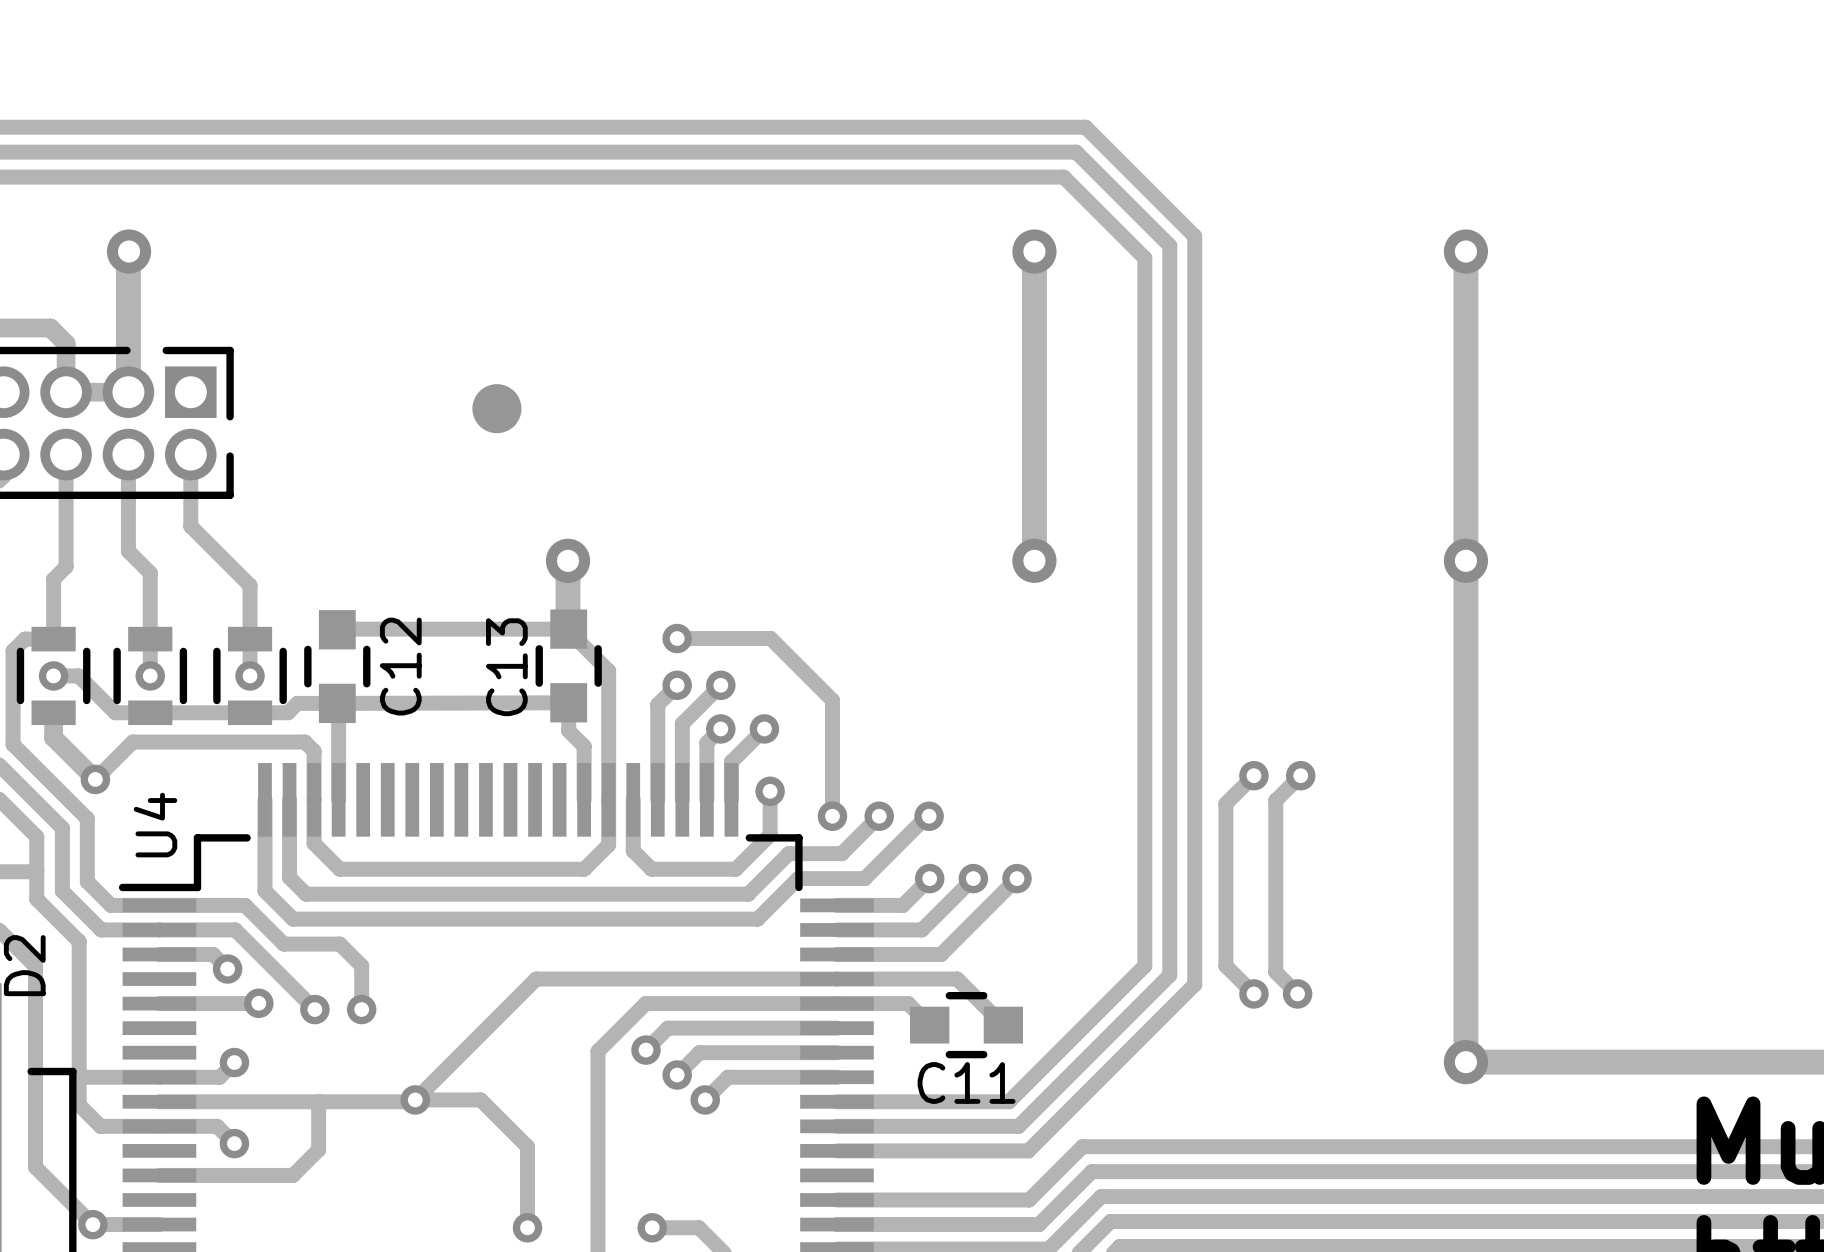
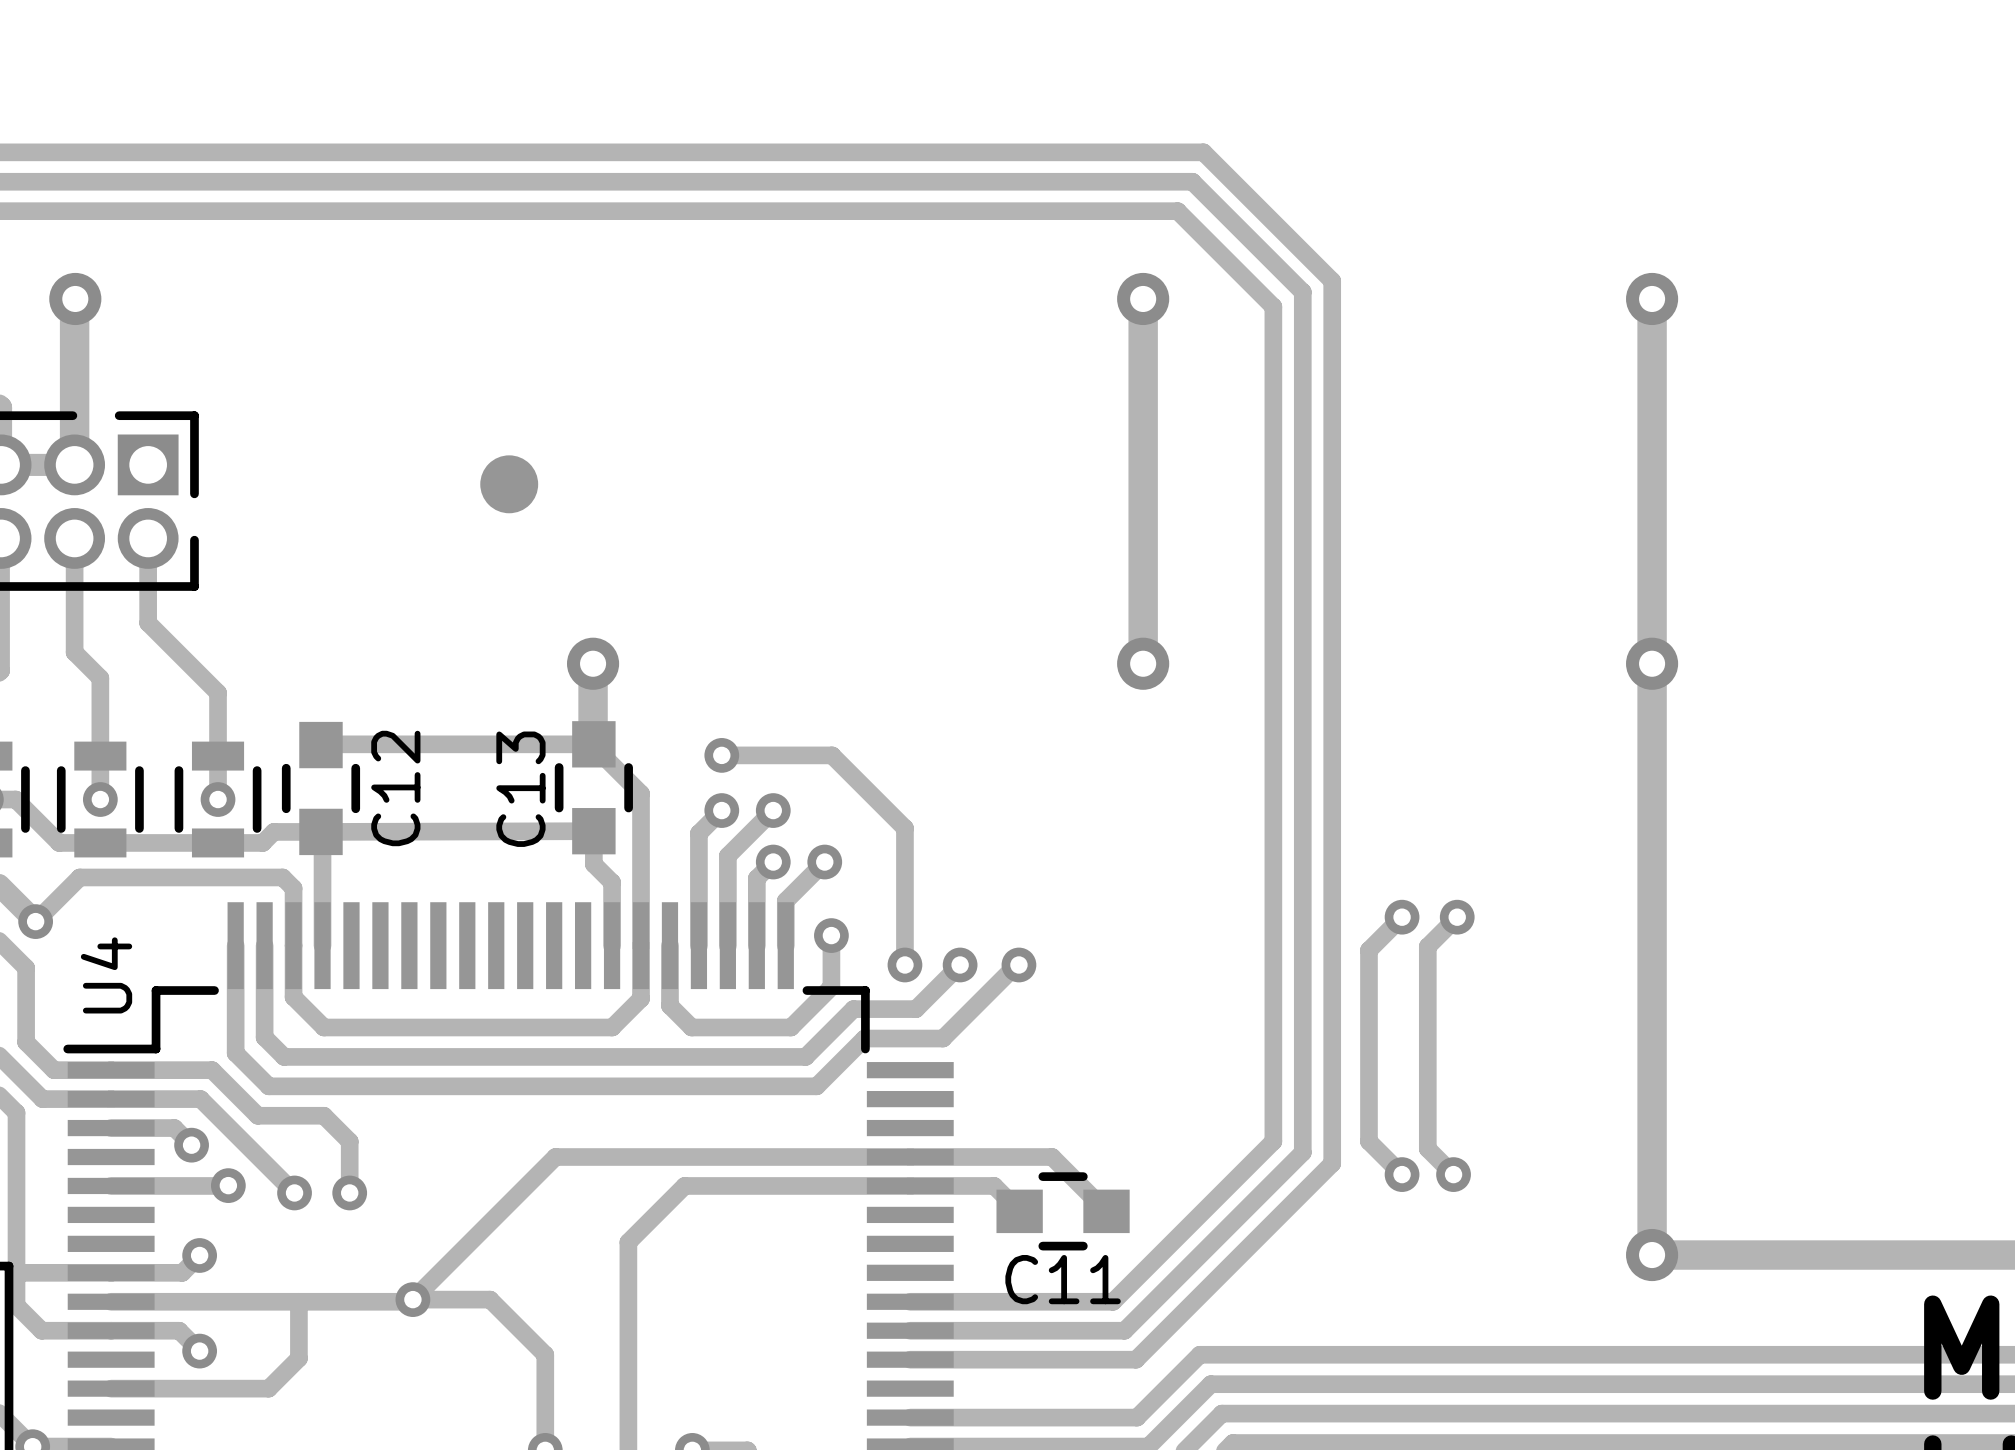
track: (929, 878) (902, 905) (836, 905) -> none
via: (929, 878) -> none
track: (973, 878) (922, 929) (836, 929) -> none
via: (973, 878) -> none
track: (1017, 878) (941, 954) (836, 954) -> none
via: (1017, 878) -> none
track: (836, 1028) (667, 1028) (645, 1050) -> none
via: (645, 1050) -> none
track: (836, 1052) (699, 1052) (677, 1075) -> none
via: (677, 1075) -> none
track: (836, 1077) (727, 1077) (705, 1099) -> none
via: (705, 1099) -> none

